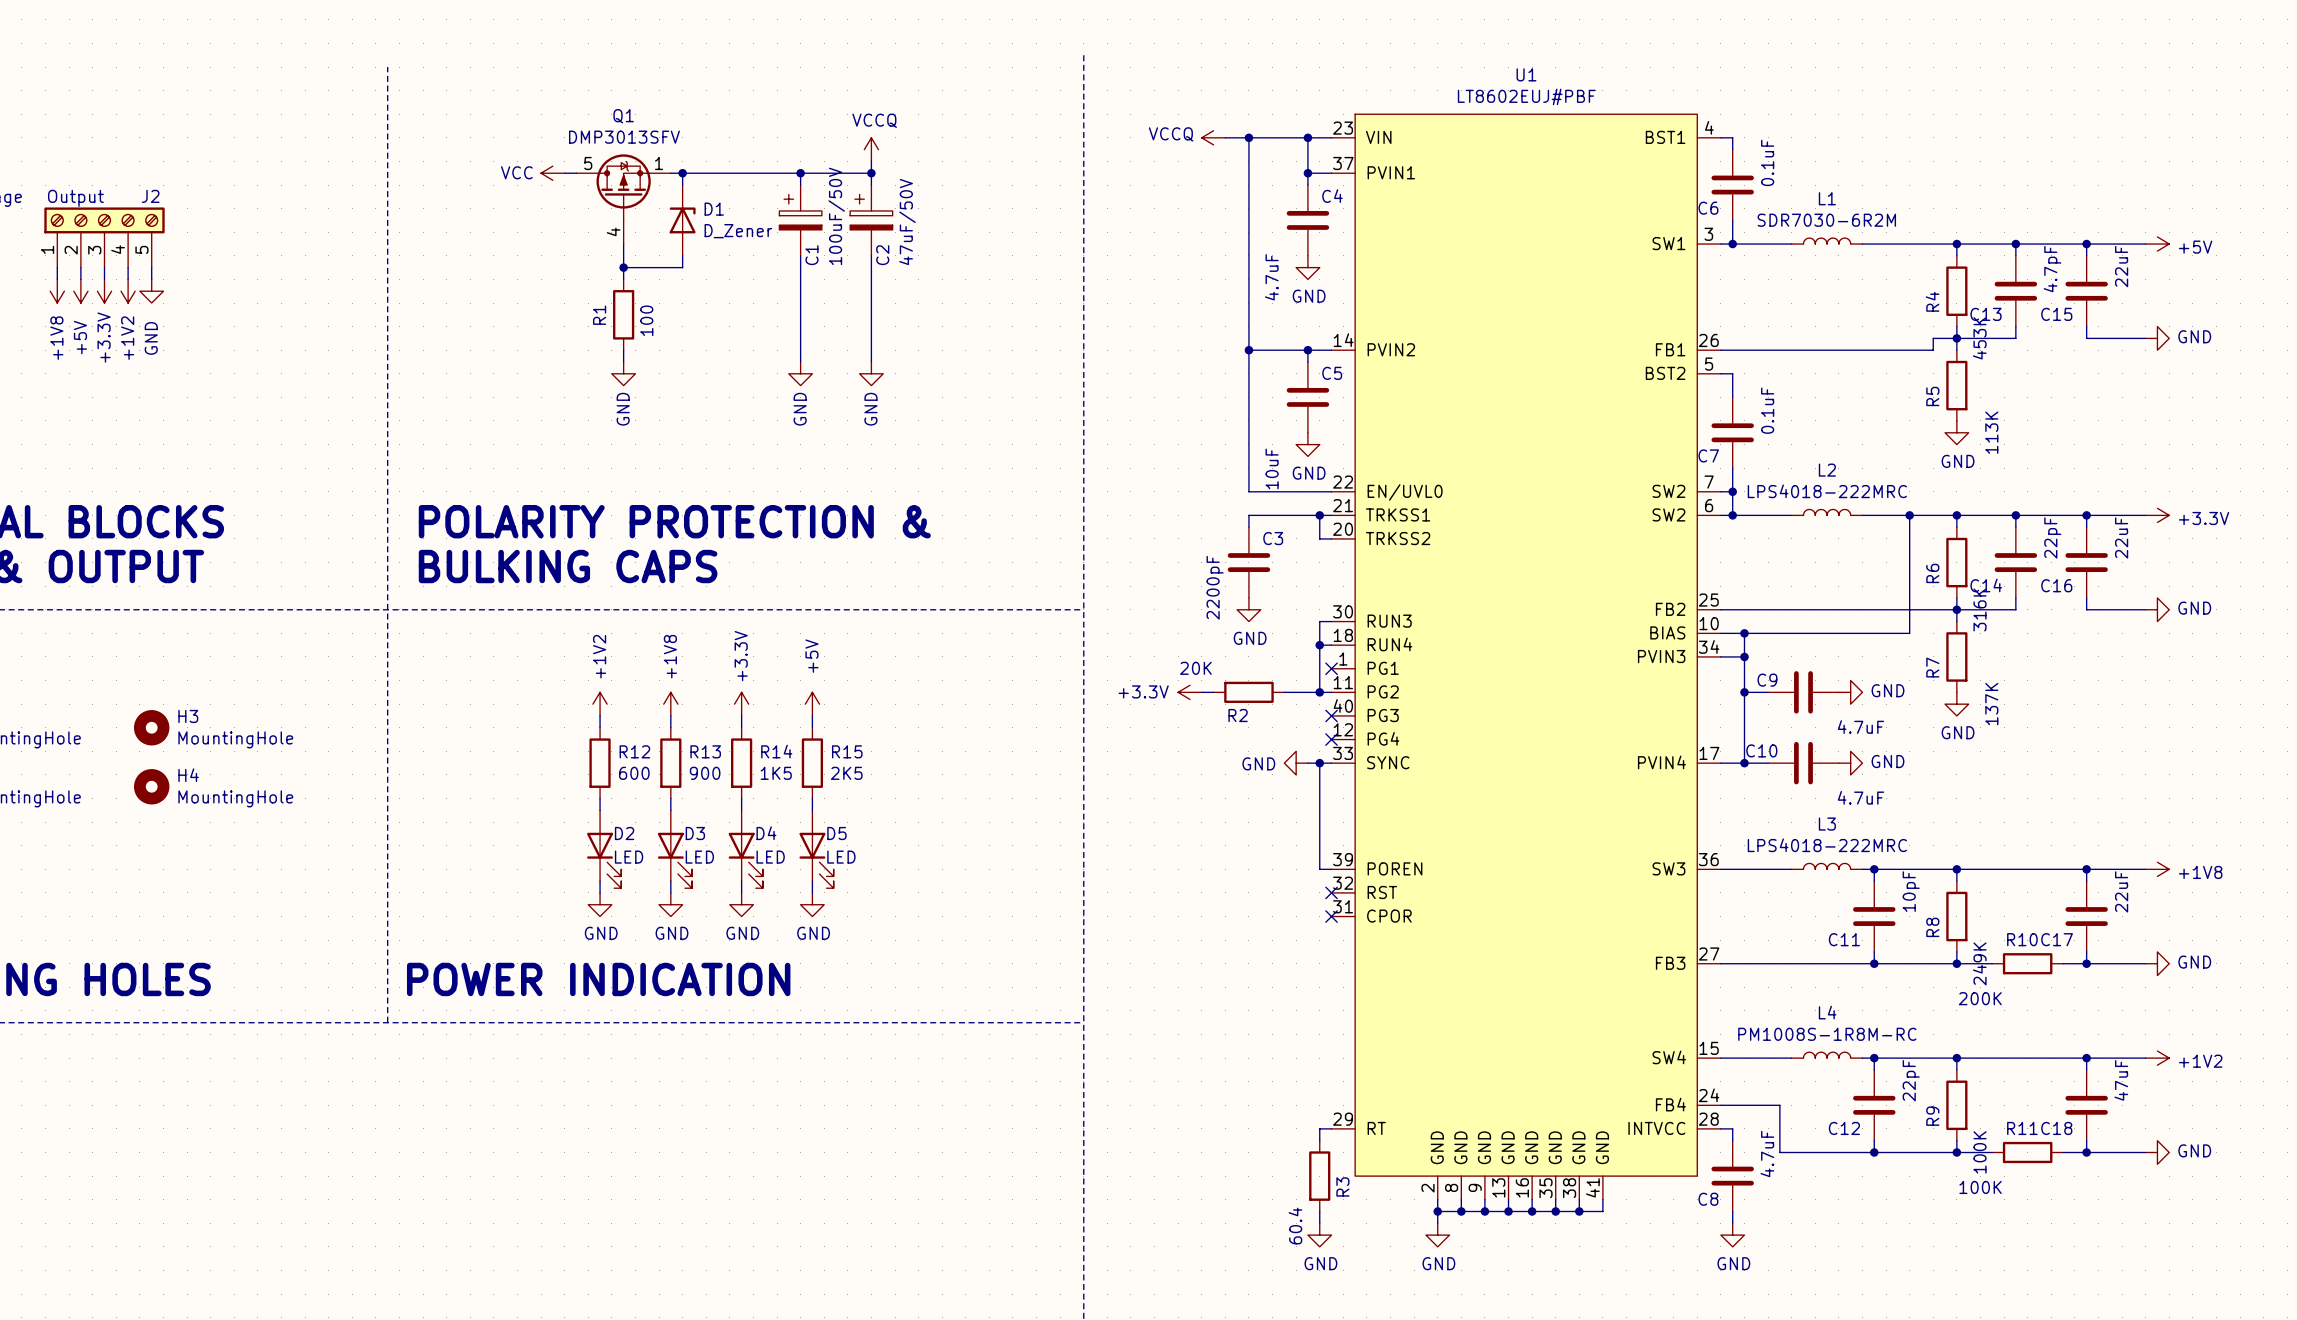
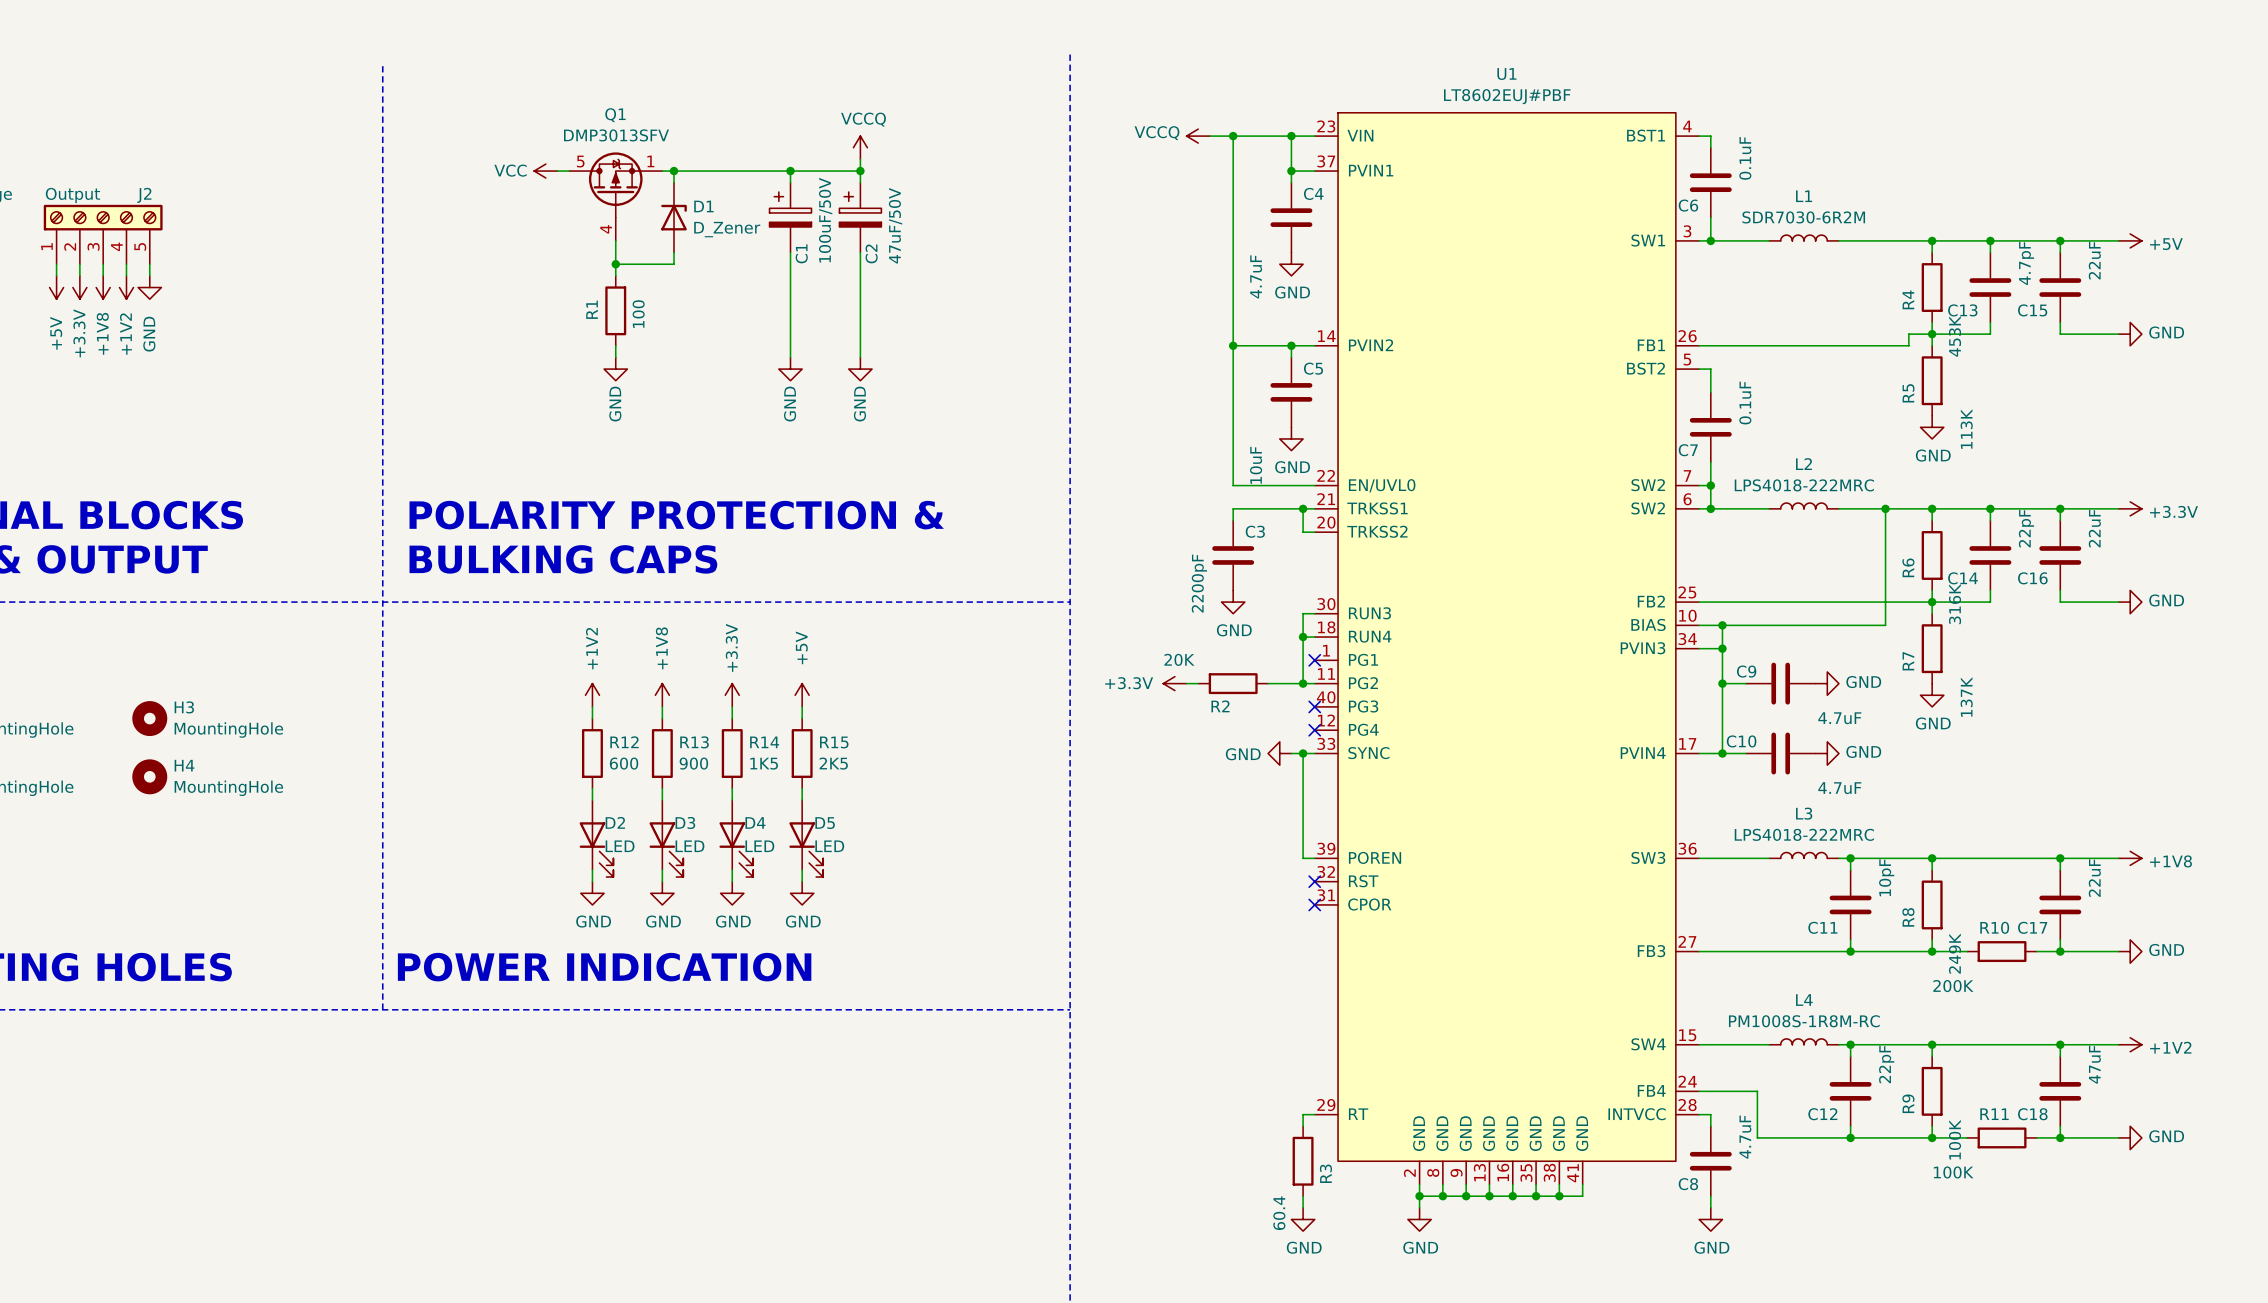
power symbol: +1V8 (57, 291) -> +5V (56, 287)
power symbol: +5V (80, 291) -> +3.3V (79, 287)
power symbol: +3.3V (104, 291) -> +1V8 (103, 287)

